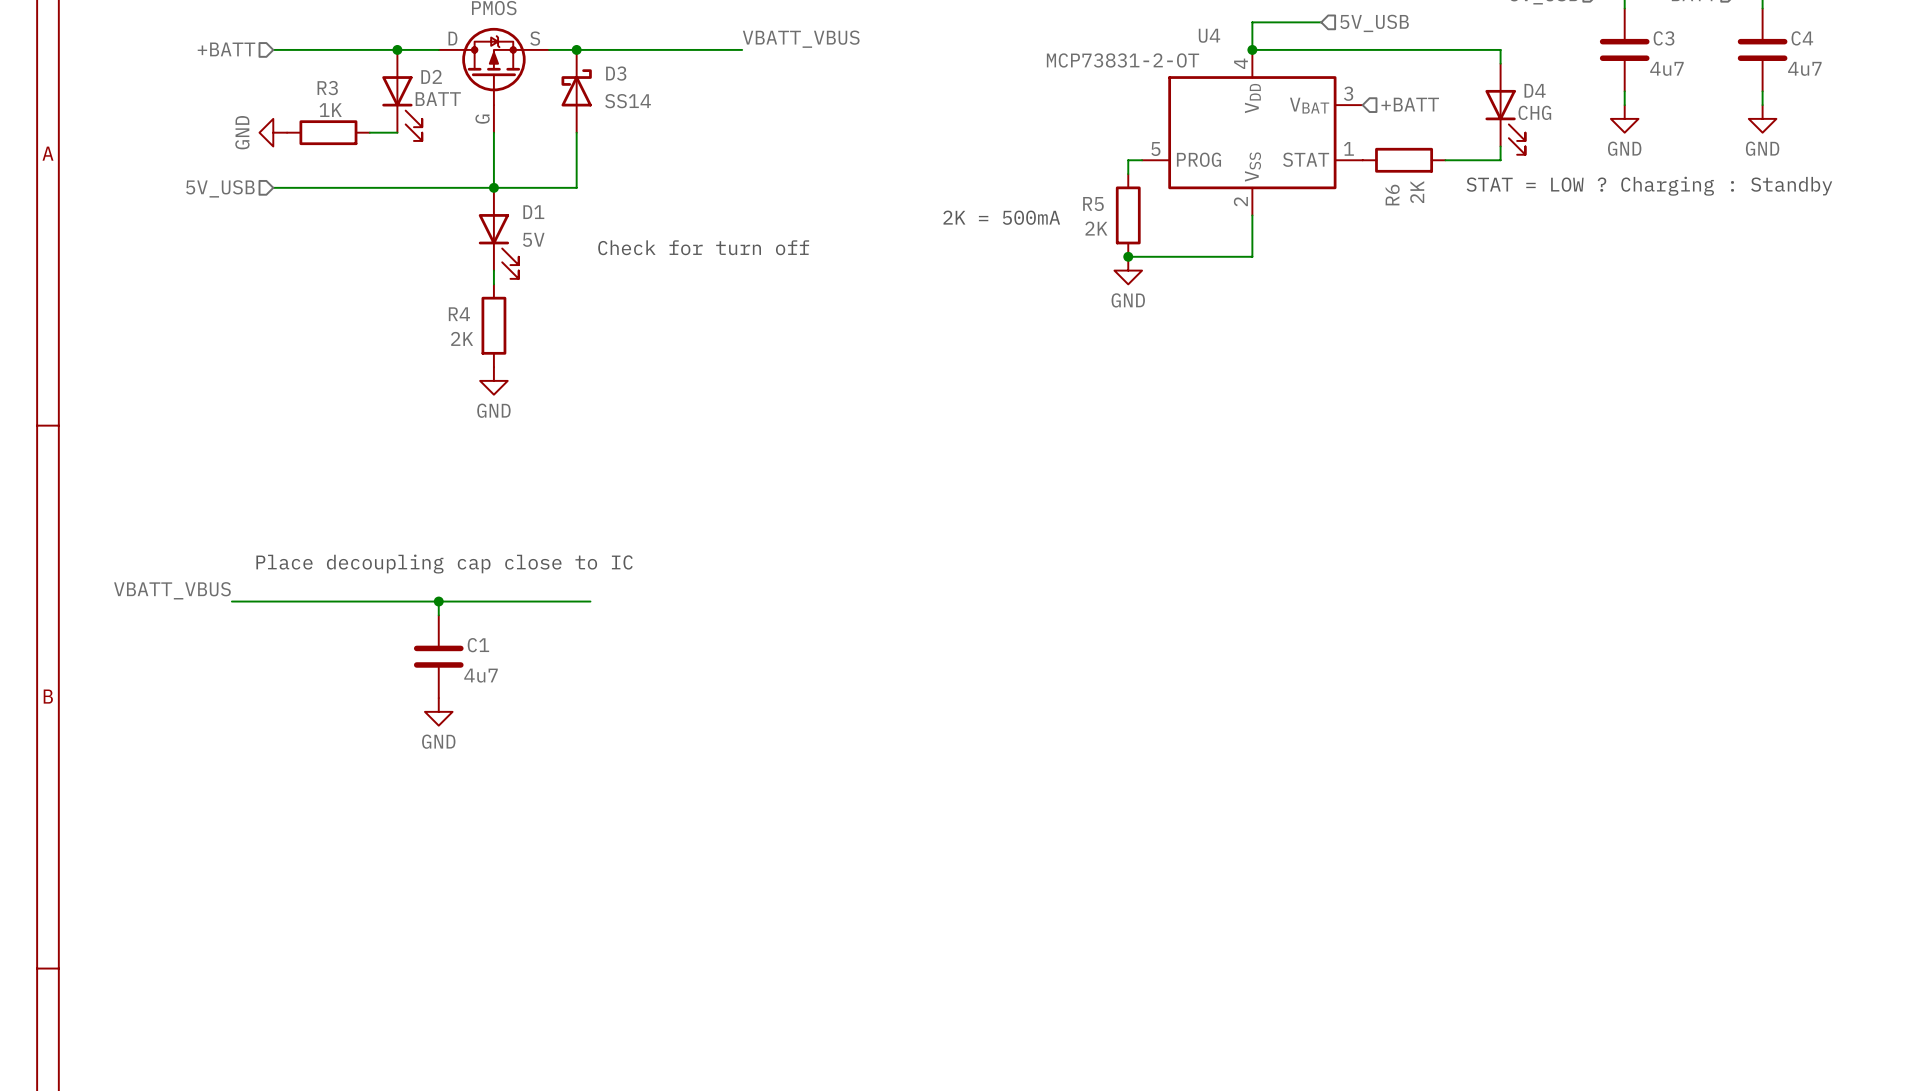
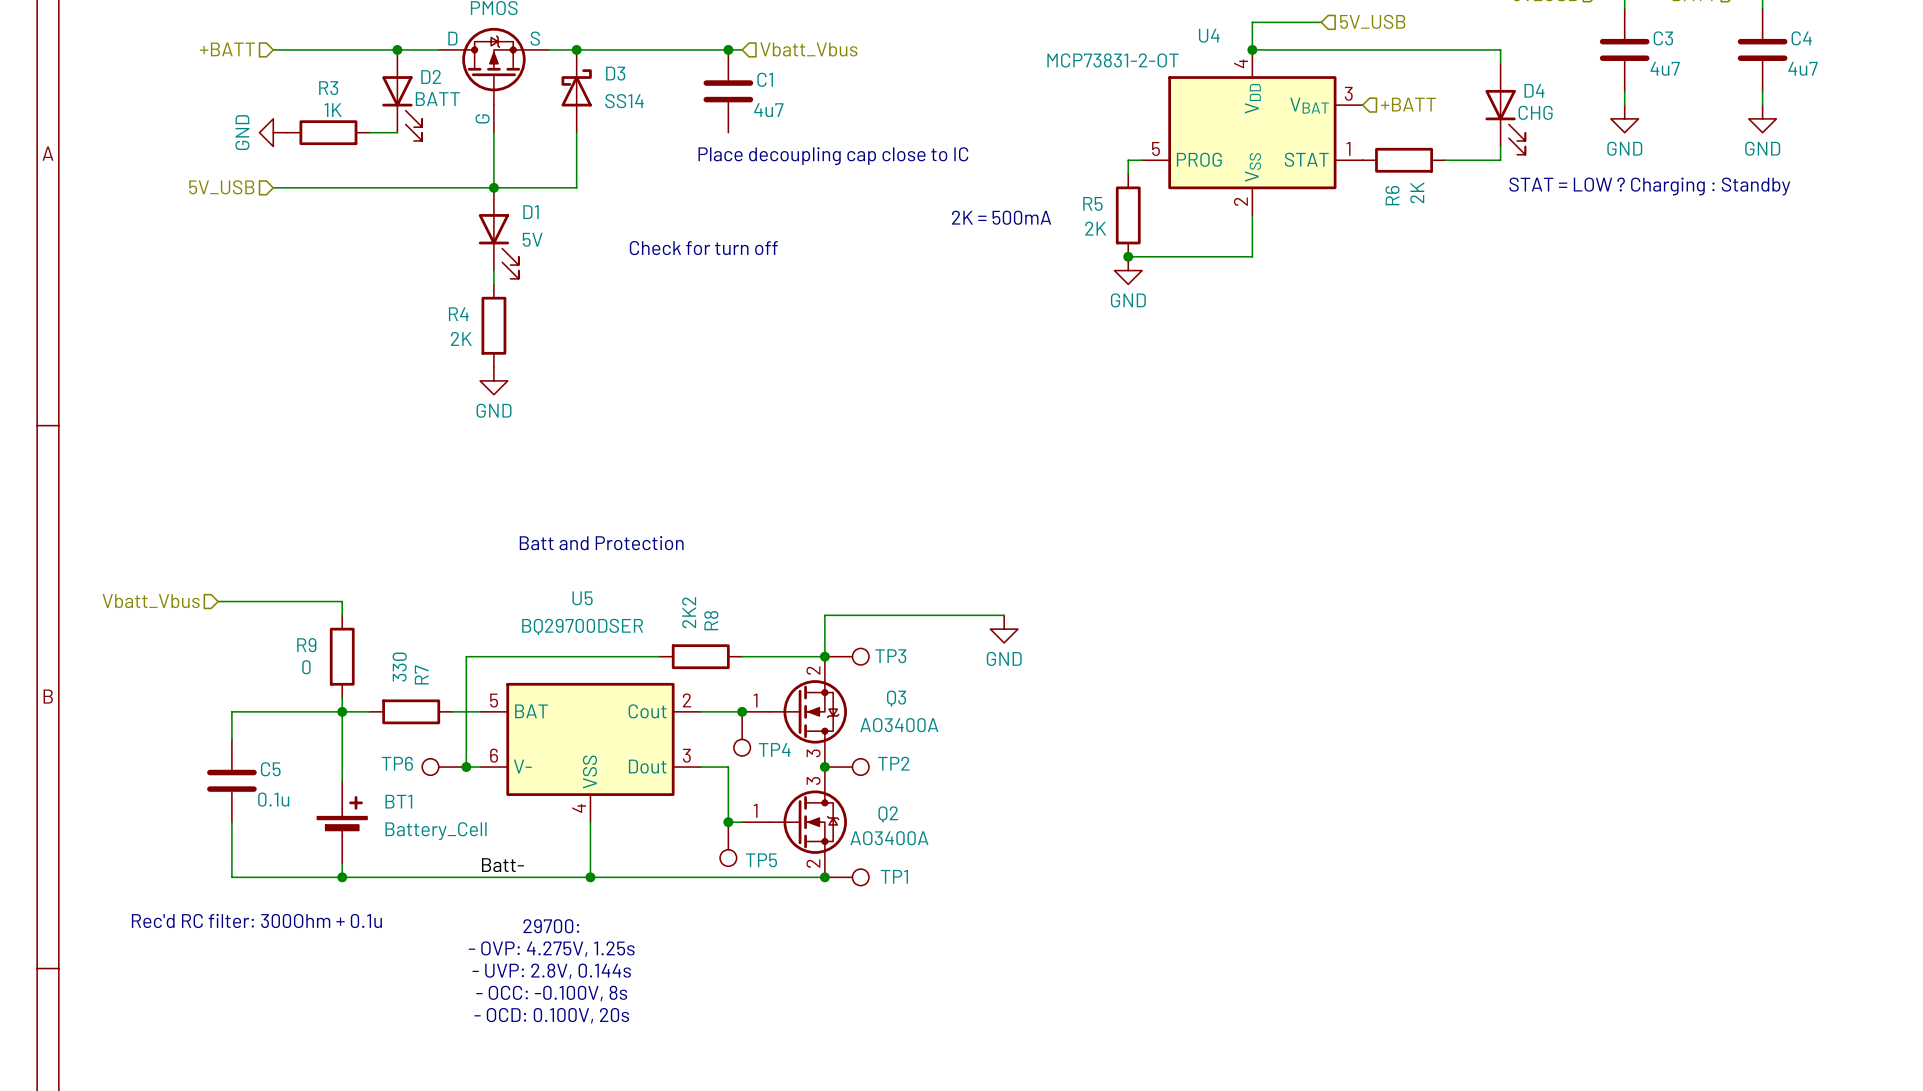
label: VBATT_VBUS (801, 39) -> none
junction: none -> (728, 49)
hierarchical label: none -> Vbatt_Vbus (808, 49)
text: none -> Place decoupling cap close to IC (833, 156)
text: none -> Batt and Protection (601, 543)
text: Place decoupling cap close to IC (444, 564) -> none
label: VBATT_VBUS (172, 590) -> none
wire: none -> (218, 601) (231, 601)
wire: (342, 601) (590, 601) -> (342, 601) (342, 615)
wire: (438, 601) (438, 615) -> none
junction: (438, 601) -> none
hierarchical label: none -> Vbatt_Vbus (151, 601)
wire: none -> (1004, 615) (824, 615) (824, 656) (742, 656)
power symbol: none -> GND (1004, 629)
R9: none -> 0 (342, 656)
C1 position: (438, 656) -> (728, 91)
wire: none -> (659, 656) (466, 656) (466, 767) (480, 767)
R8: none -> 2K2 (700, 656)
junction: none -> (824, 656)
TP3: none -> (846, 656)
wire: none -> (342, 698) (342, 780)
junction: none -> (342, 711)
wire: none -> (369, 711) (231, 711) (231, 739)
R7: none -> 330 (411, 711)
power symbol: GND (438, 711) -> none
wire: none -> (452, 711) (480, 711)
wire: none -> (700, 711) (742, 711)
junction: none -> (742, 711)
Q3: none -> AO3400A (794, 711)
TP4: none -> (742, 733)
U5: none -> BQ29700DSER (590, 752)
TP6: none -> (444, 767)
junction: none -> (466, 767)
wire: none -> (700, 767) (728, 767) (728, 822) (742, 822)
junction: none -> (824, 767)
TP2: none -> (846, 767)
C5: none -> 0.1u (231, 780)
wire: none -> (231, 822) (231, 877) (824, 877)
BT1: none -> Battery_Cell (342, 822)
wire: none -> (590, 822) (590, 877)
junction: none -> (728, 822)
Q2: none -> AO3400A (794, 822)
TP5: none -> (728, 844)
wire: none -> (342, 863) (342, 877)
label: none -> Batt- (502, 865)
junction: none -> (342, 877)
junction: none -> (590, 877)
junction: none -> (824, 877)
TP1: none -> (846, 877)
text: none -> Rec'd RC filter: 300Ohm + 0.1u (256, 920)
text: none -> 29700: (551, 926)
text: none -> - OVP: 4.275V, 1.25s (551, 949)
text: none -> - UVP: 2.8V, 0.144s (551, 971)
text: none -> - OCC: -0.100V, 8s (551, 993)
text: none -> - OCD: 0.100V, 20s (551, 1015)

